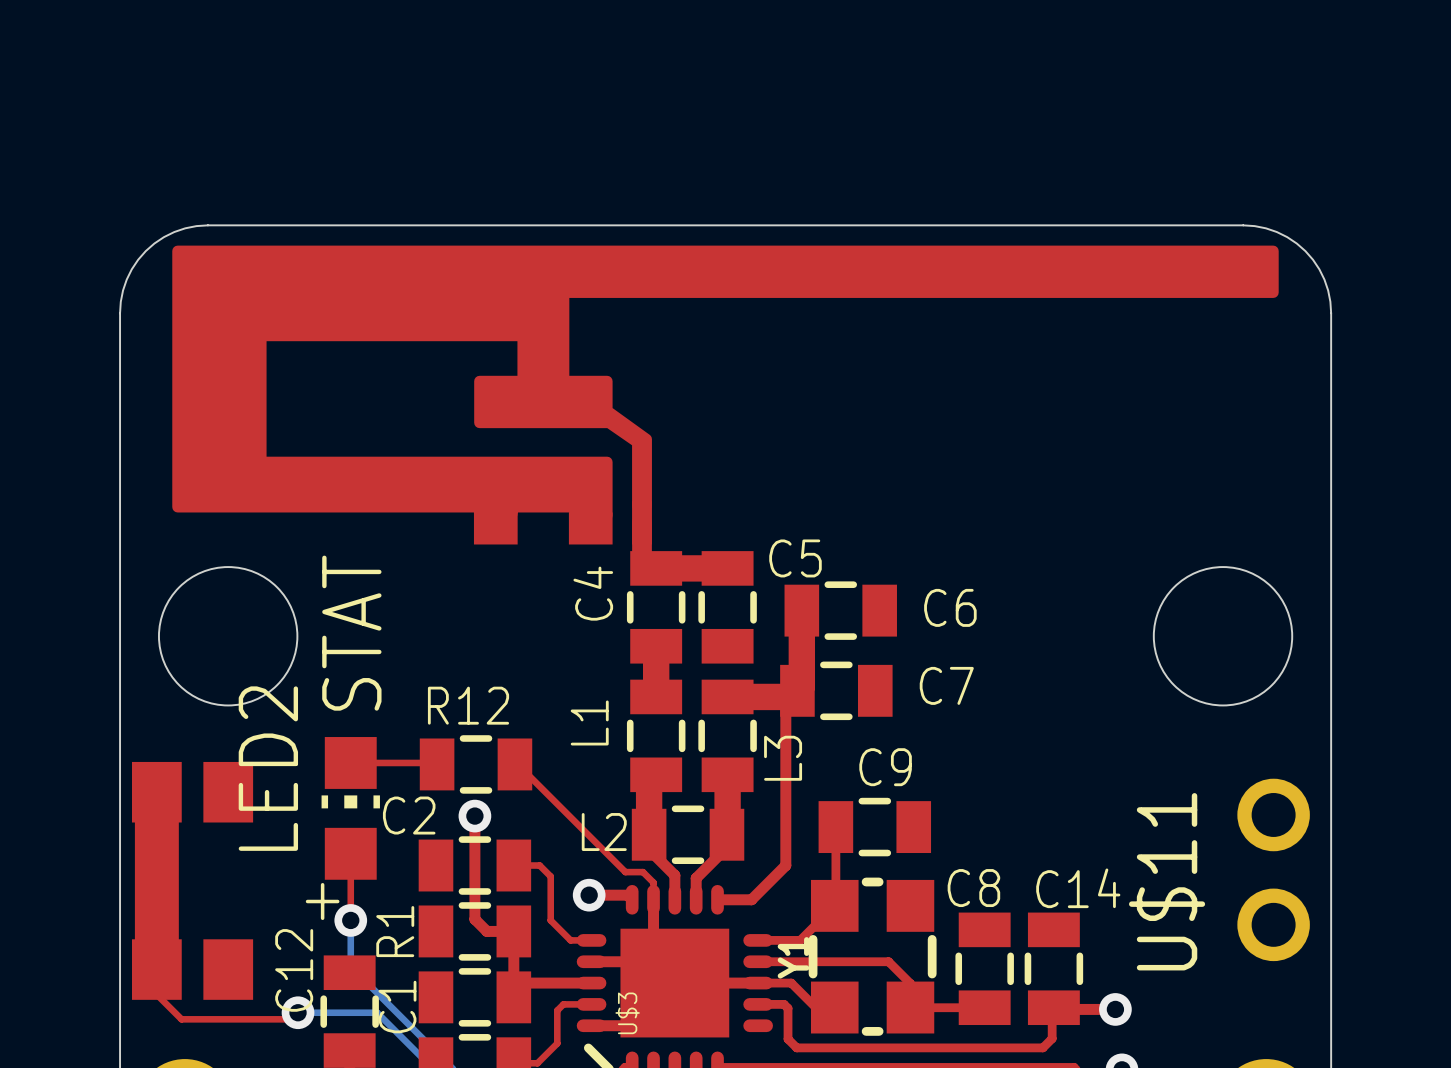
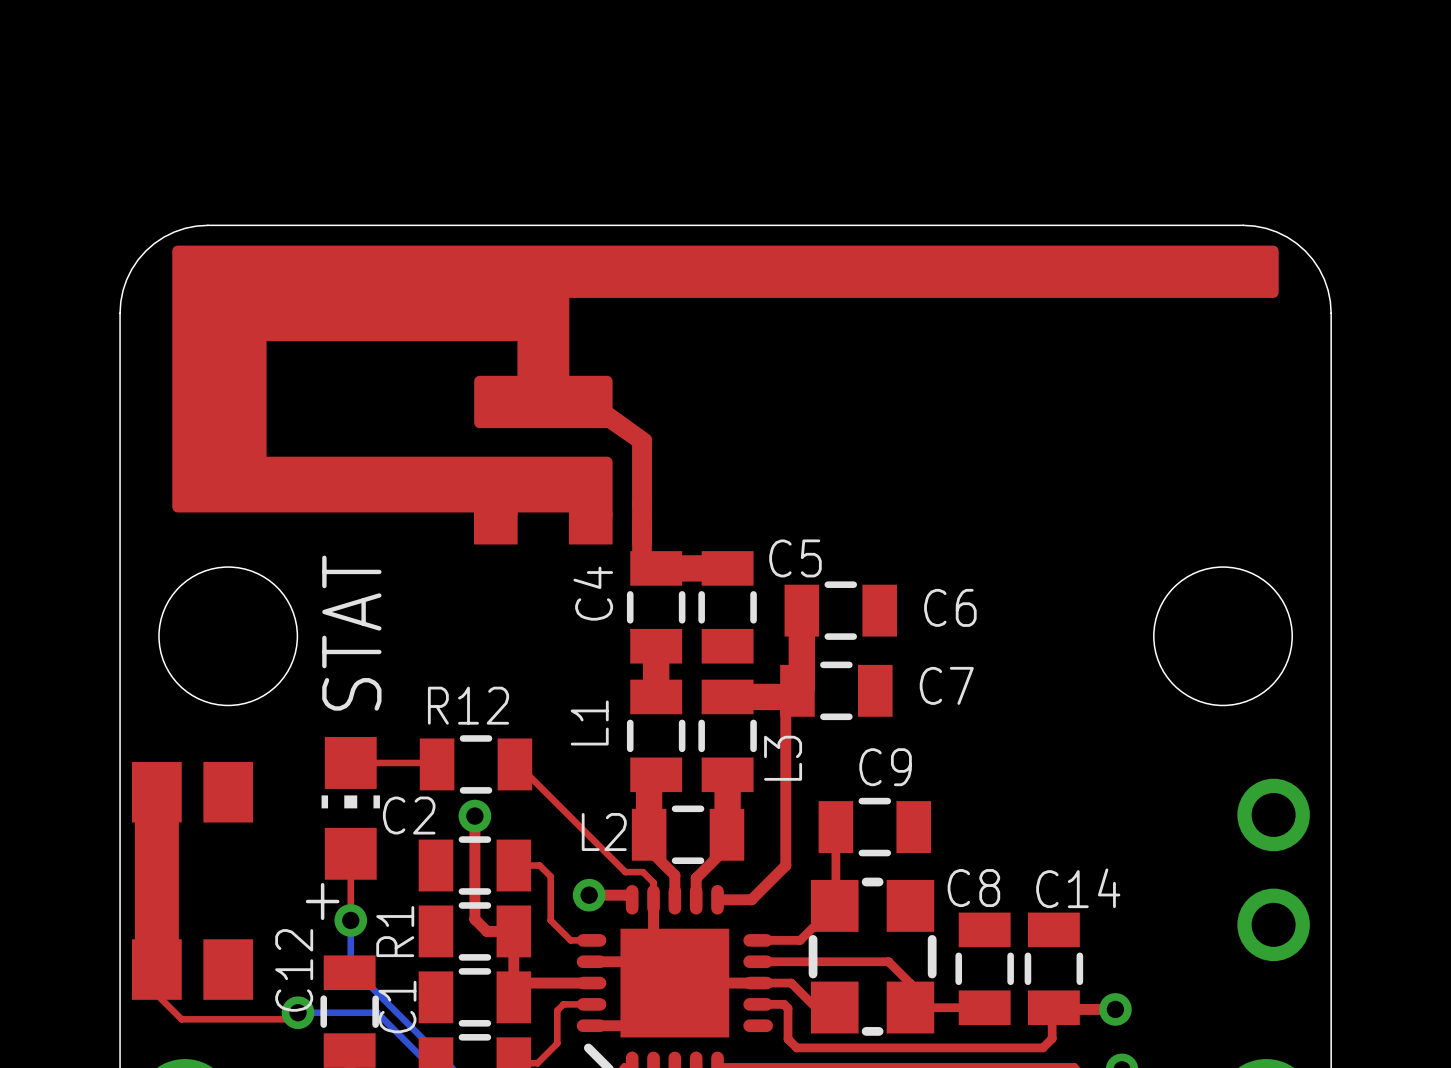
LED2 name: LED2 (268, 768) -> none
U$11 name: U$11 (1167, 881) -> none
Y1 name: Y1 (793, 957) -> none
U$3 name: U$3 (627, 1013) -> none

